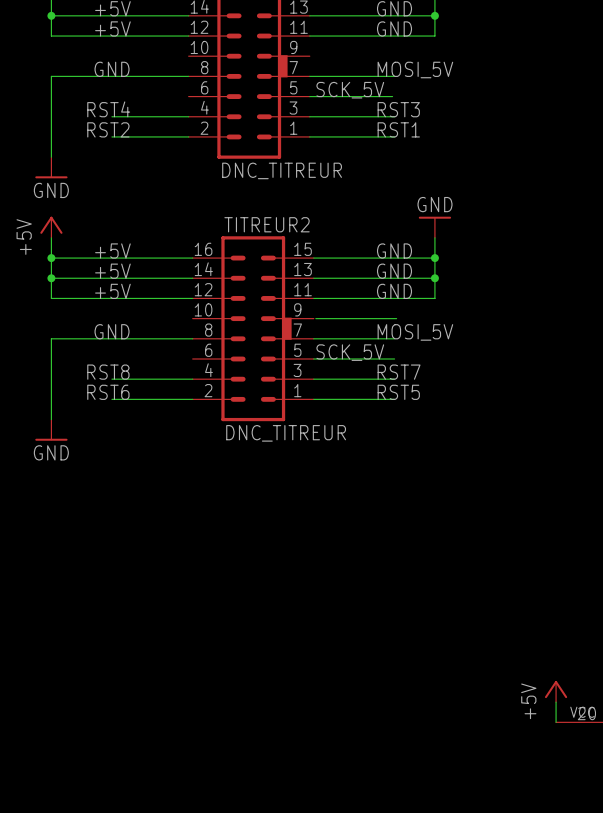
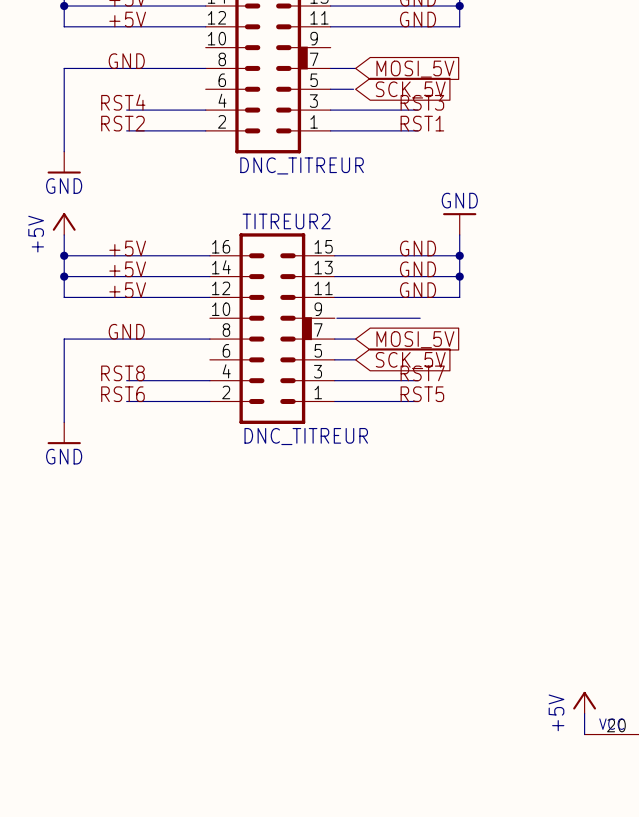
label: MOSI_5V (415, 70) -> none
wire: (334, 76) (394, 76) -> none
global label: none -> MOSI_5V (415, 69)
label: SCK_5V (350, 90) -> none
wire: (331, 96) (392, 96) -> none
global label: none -> SCK_5V (410, 89)
label: MOSI_5V (415, 332) -> none
wire: (334, 338) (394, 338) -> none
global label: none -> MOSI_5V (415, 339)
label: SCK_5V (350, 352) -> none
wire: (334, 359) (394, 359) -> none
global label: none -> SCK_5V (410, 360)

